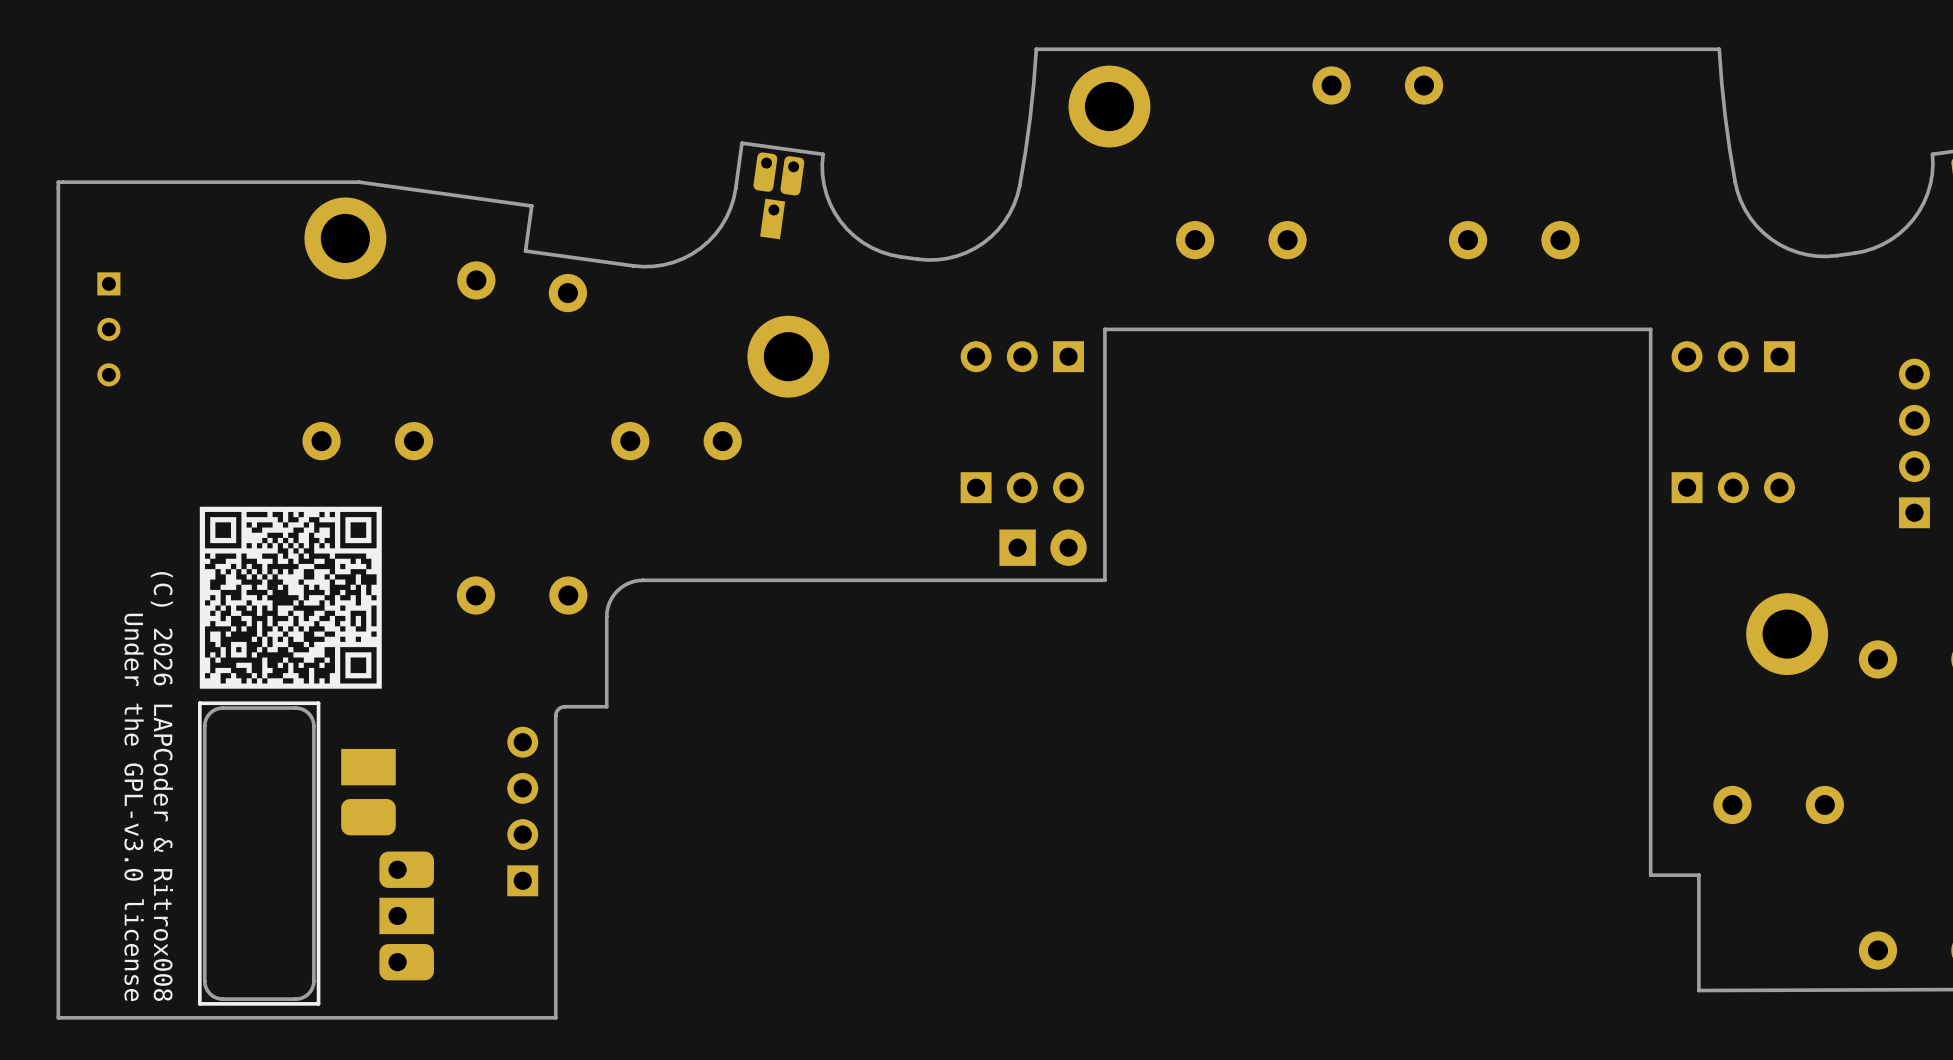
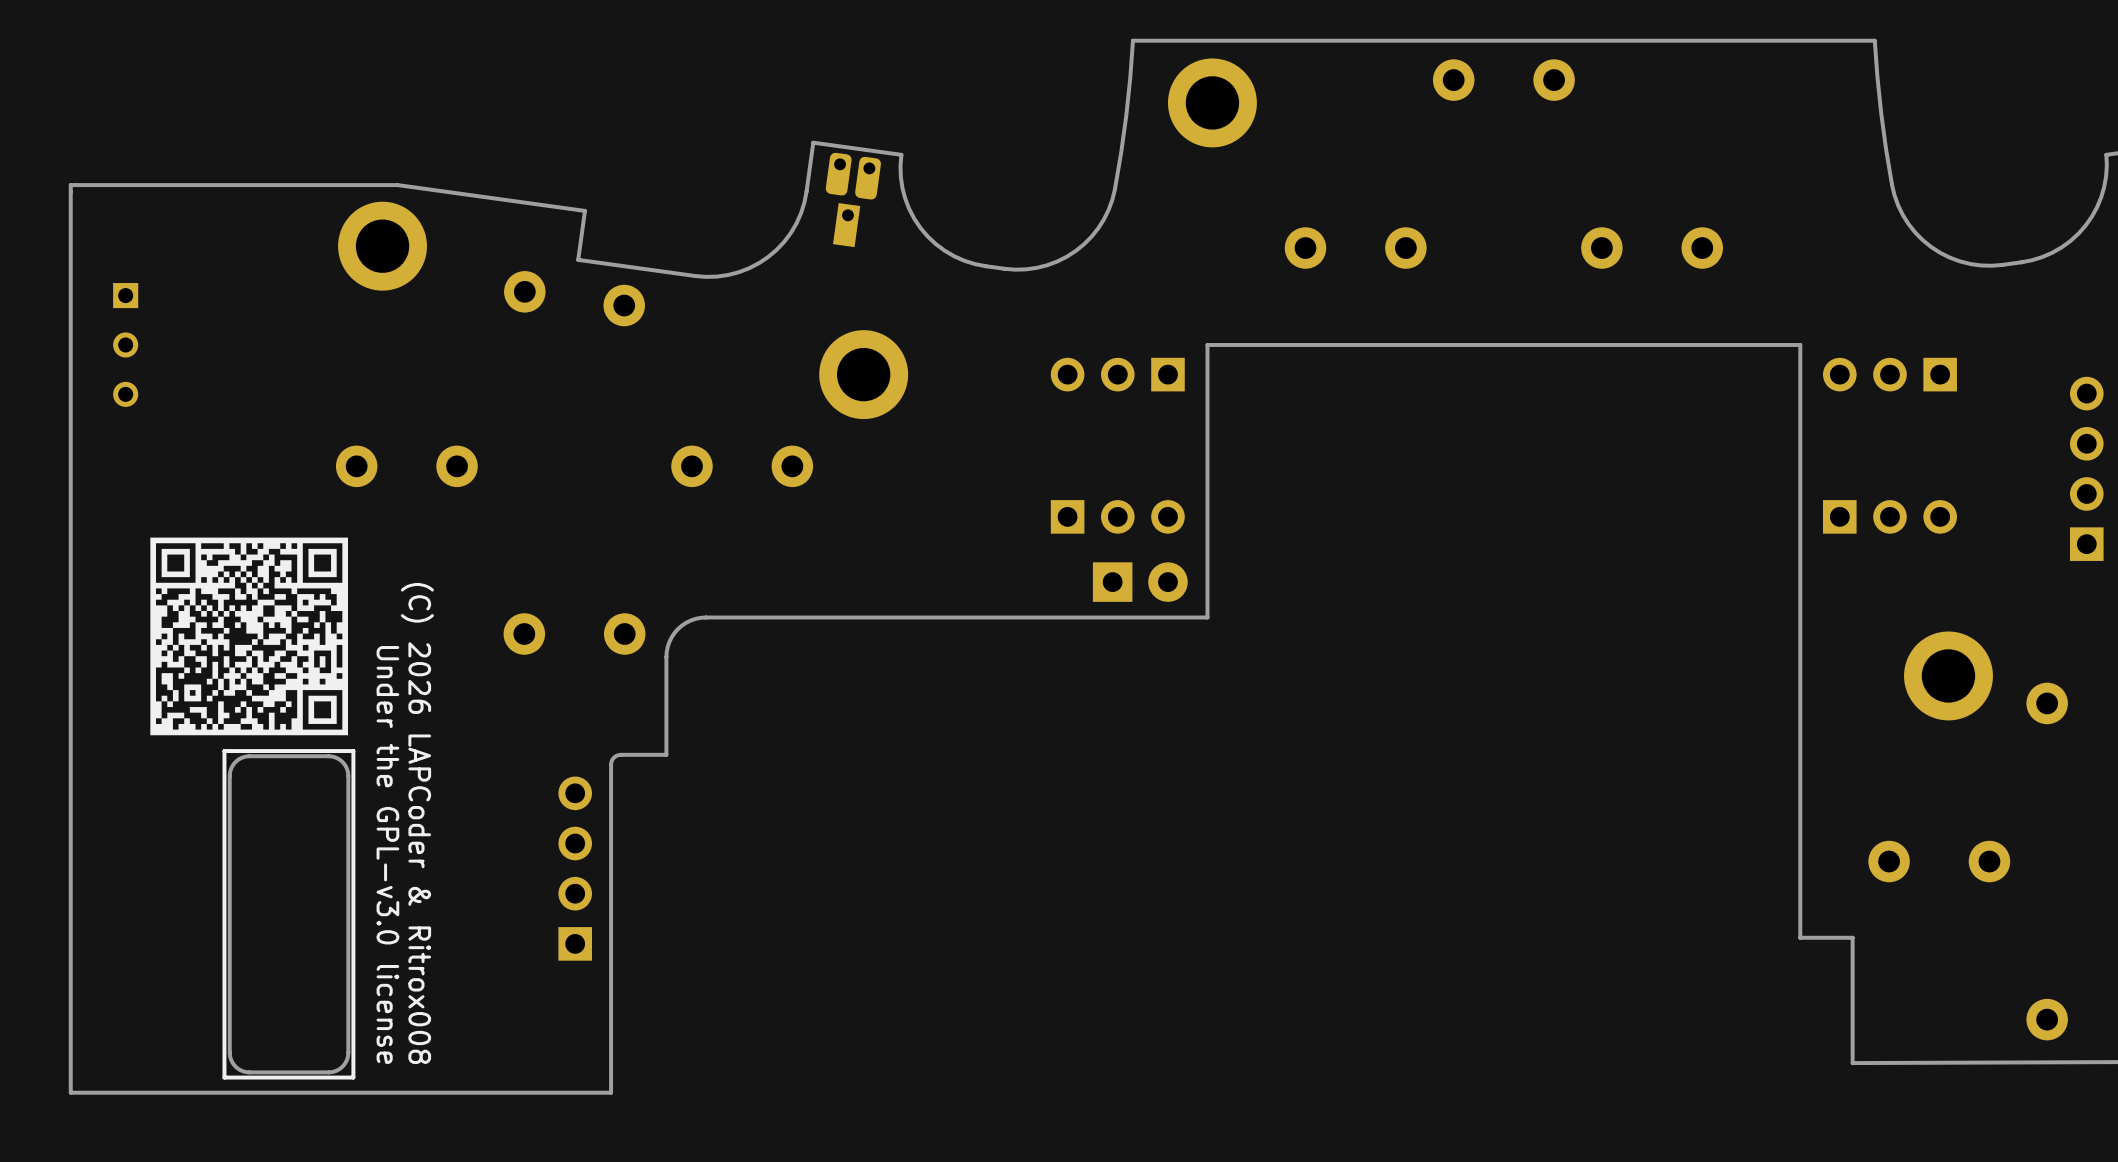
drawing position: (290, 597) -> (249, 636)
text position: (C) 2026 LAPCoder & Ritrox008 (161, 786) -> (C) 2026 LAPCoder & Ritrox008 (417, 823)
text position: Under the GPL-v3.0 license (134, 807) -> Under the GPL-v3.0 license (387, 854)
part: (318, 853) -> none

